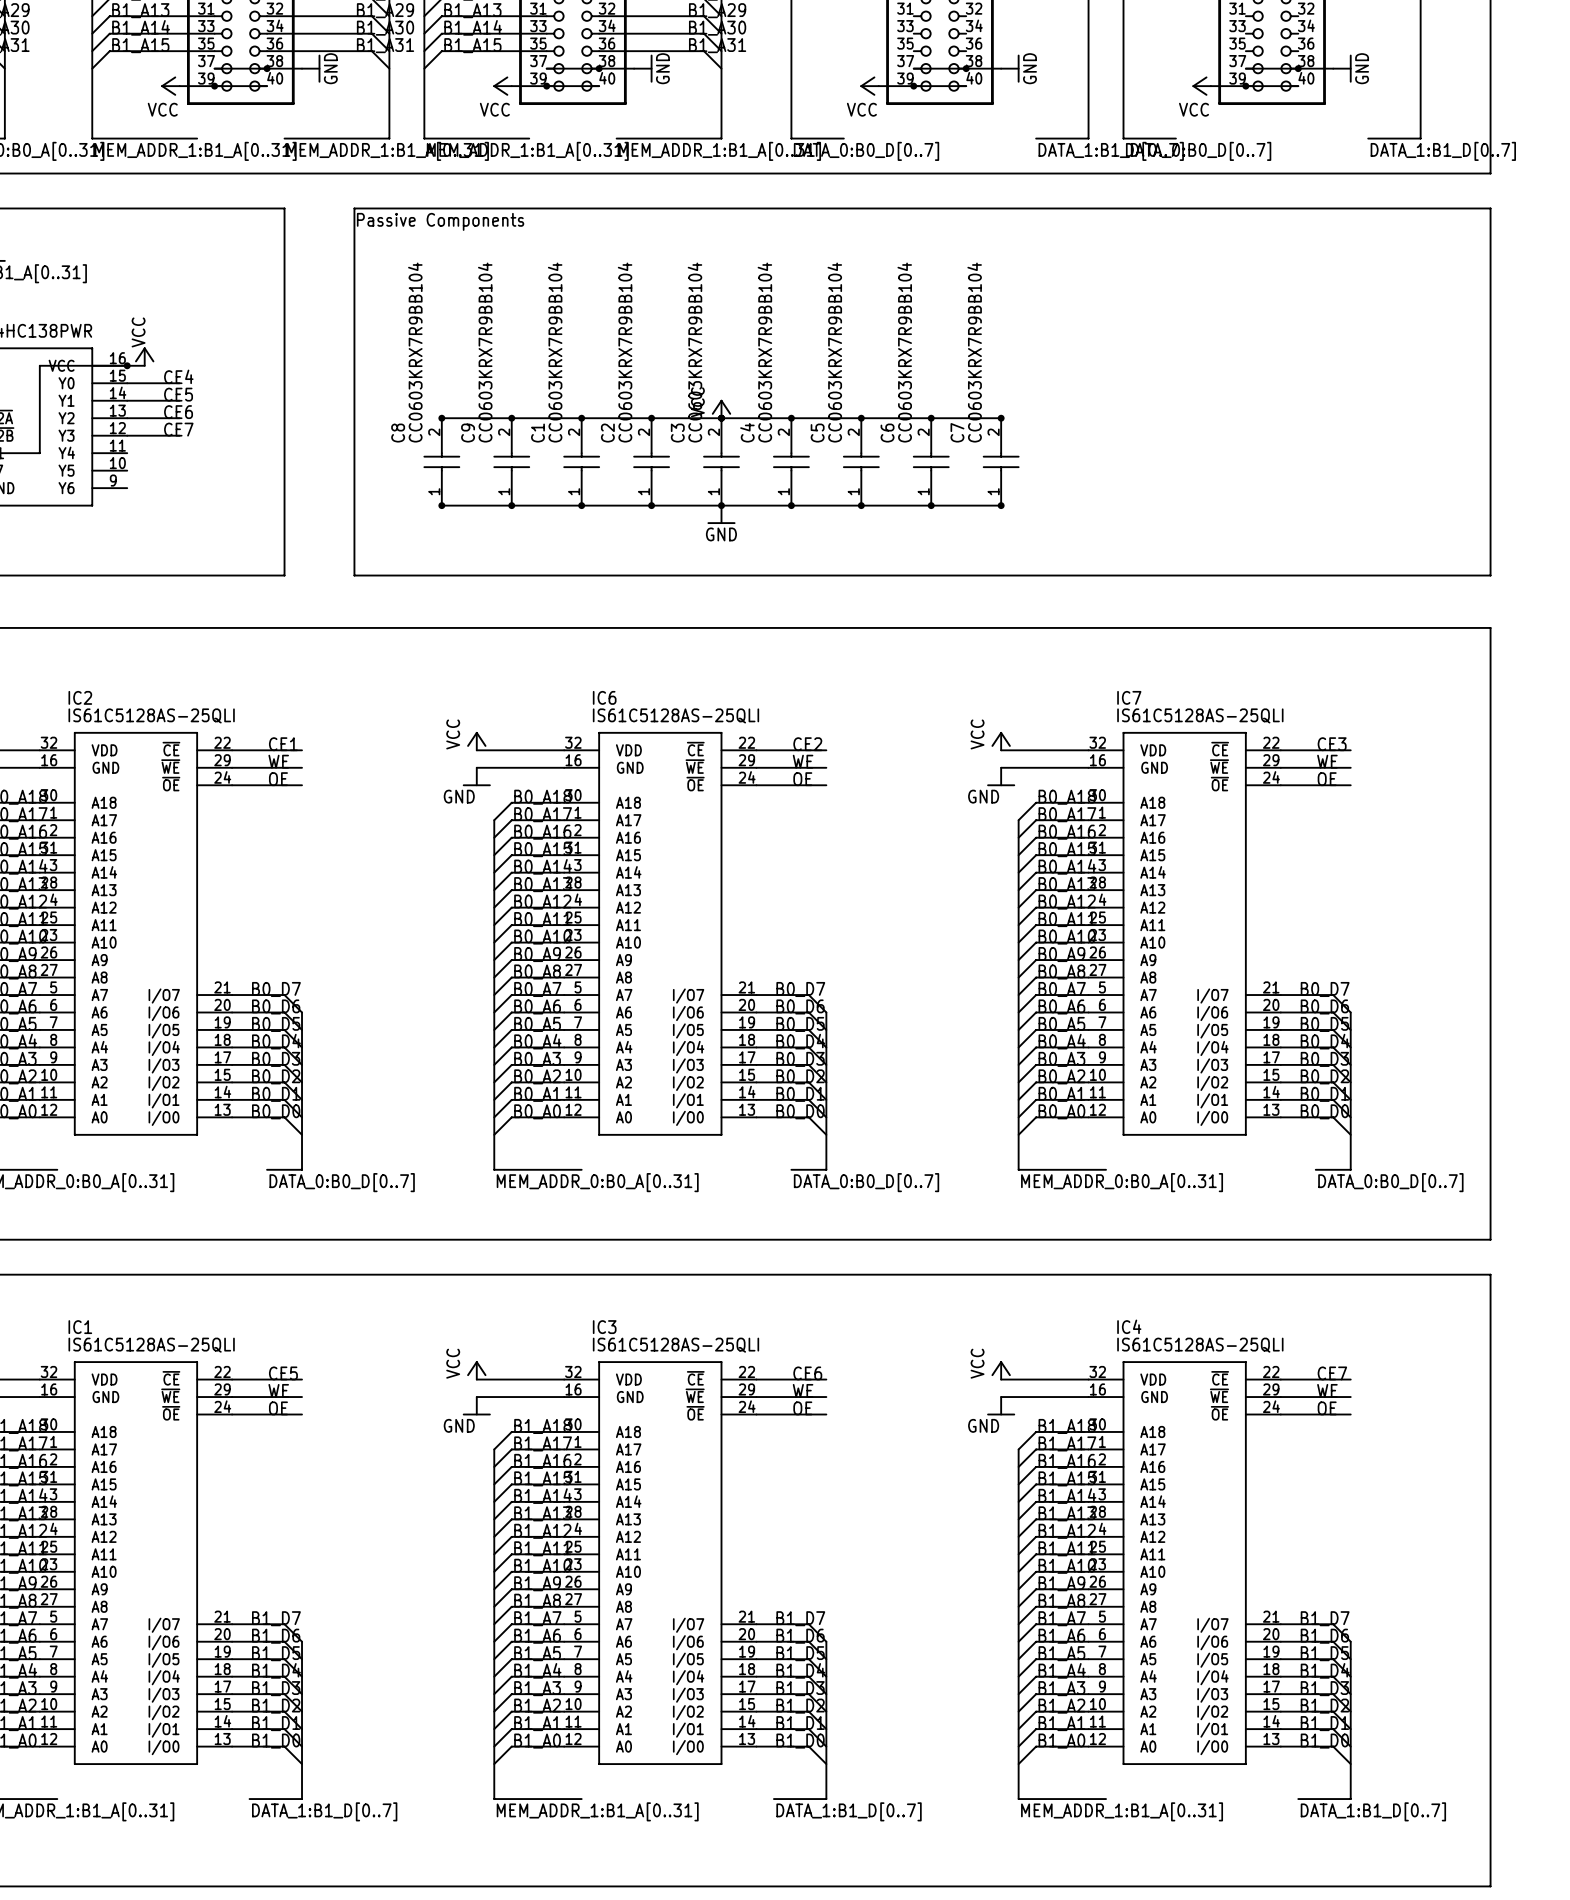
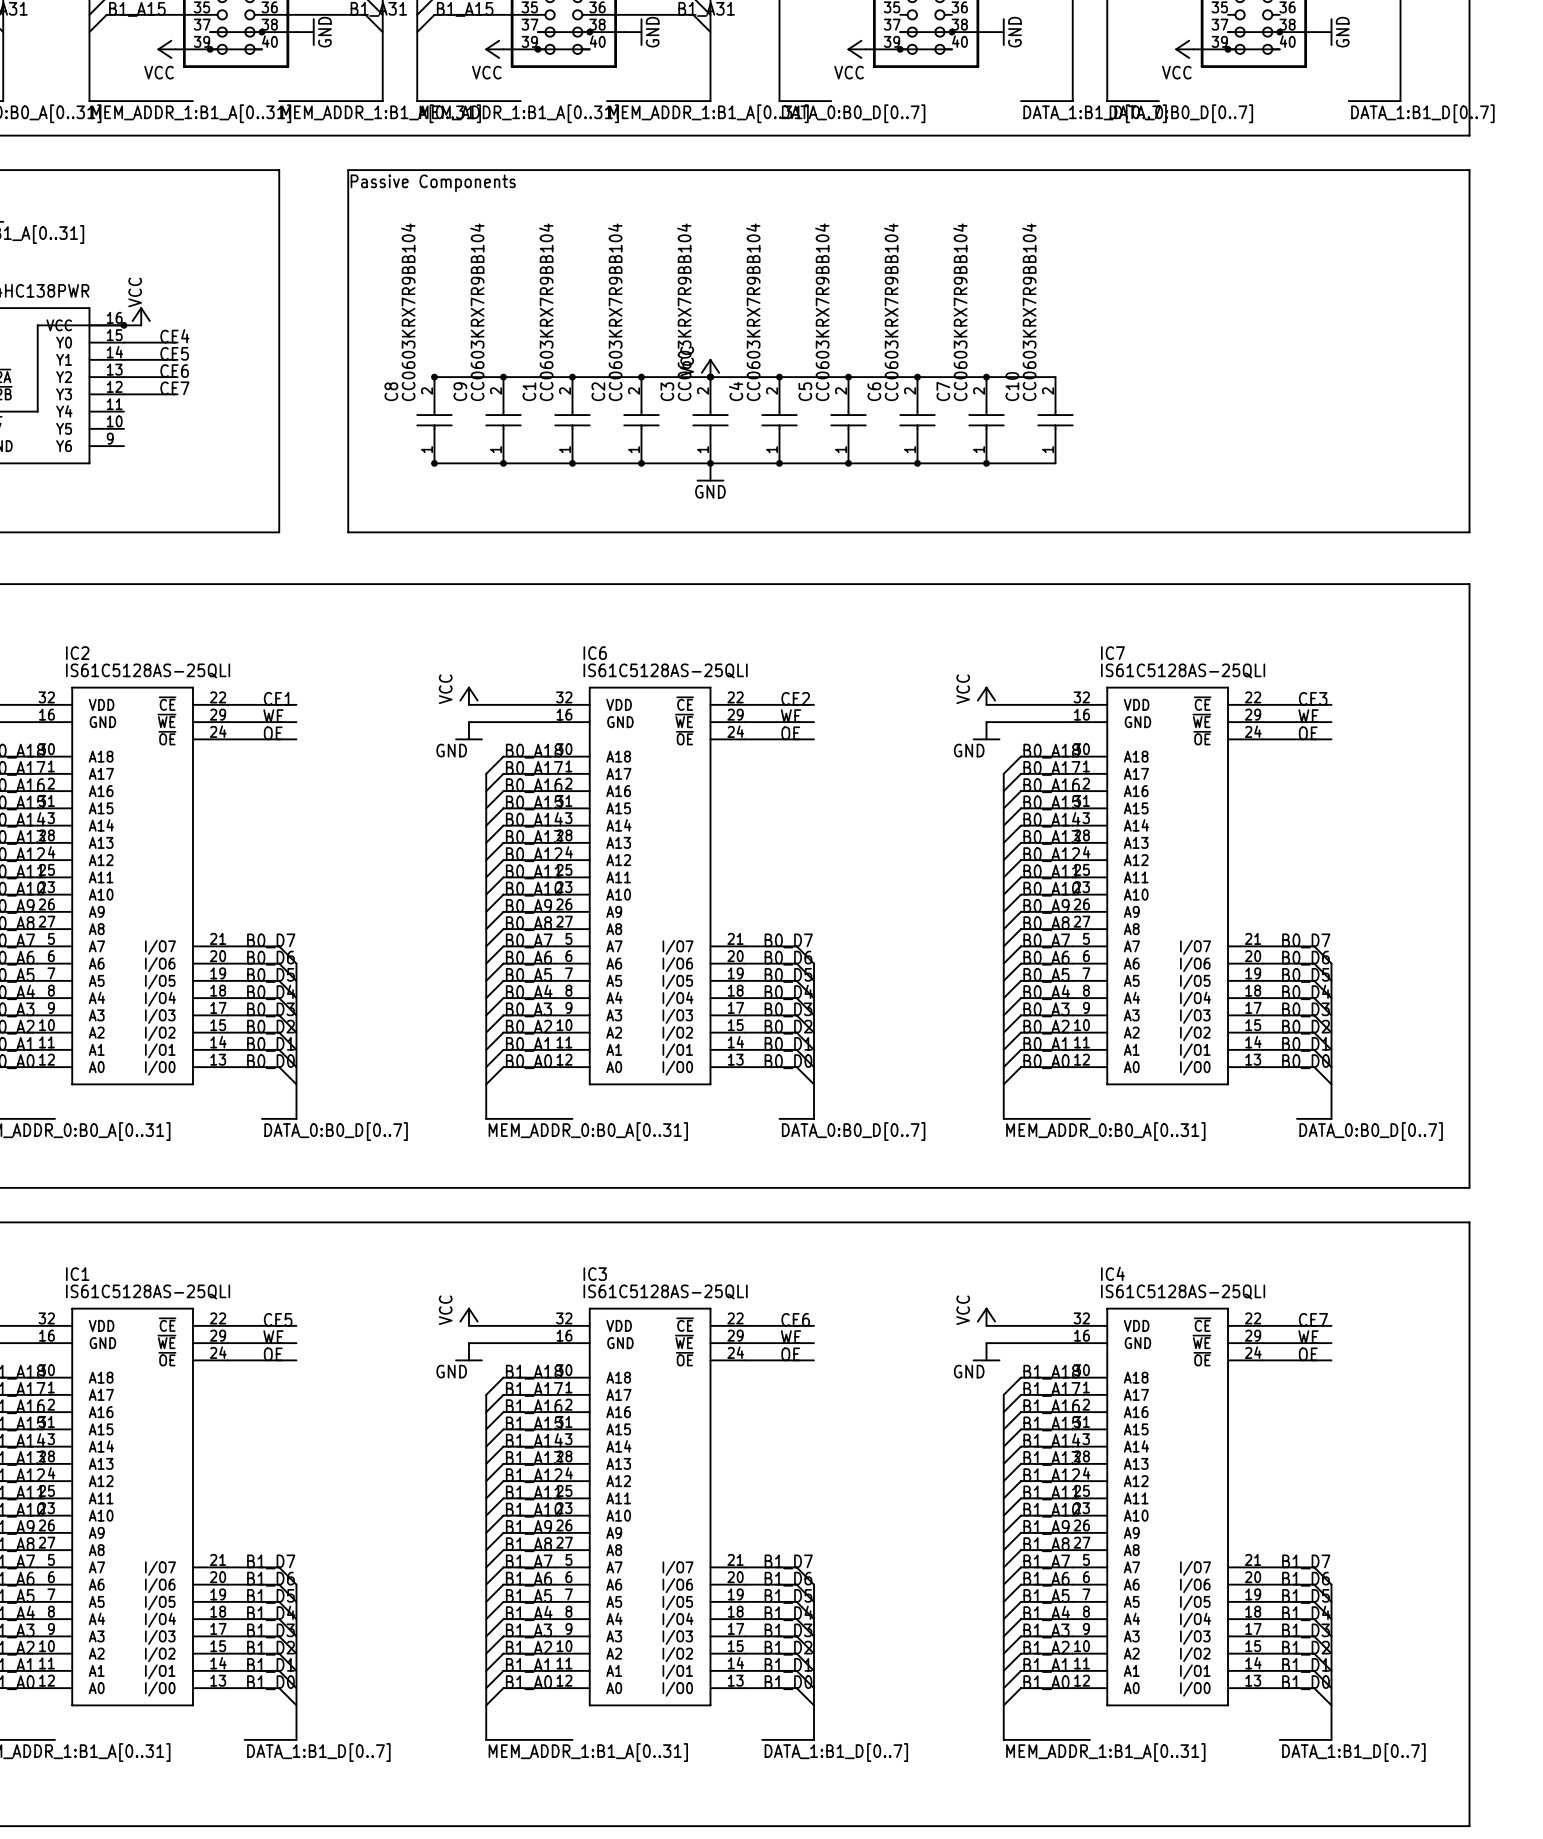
wire: none -> (986, 377) (1055, 377)
C10: none -> CC0603KRX7R9BB104 (1055, 420)
wire: none -> (986, 463) (1055, 463)

